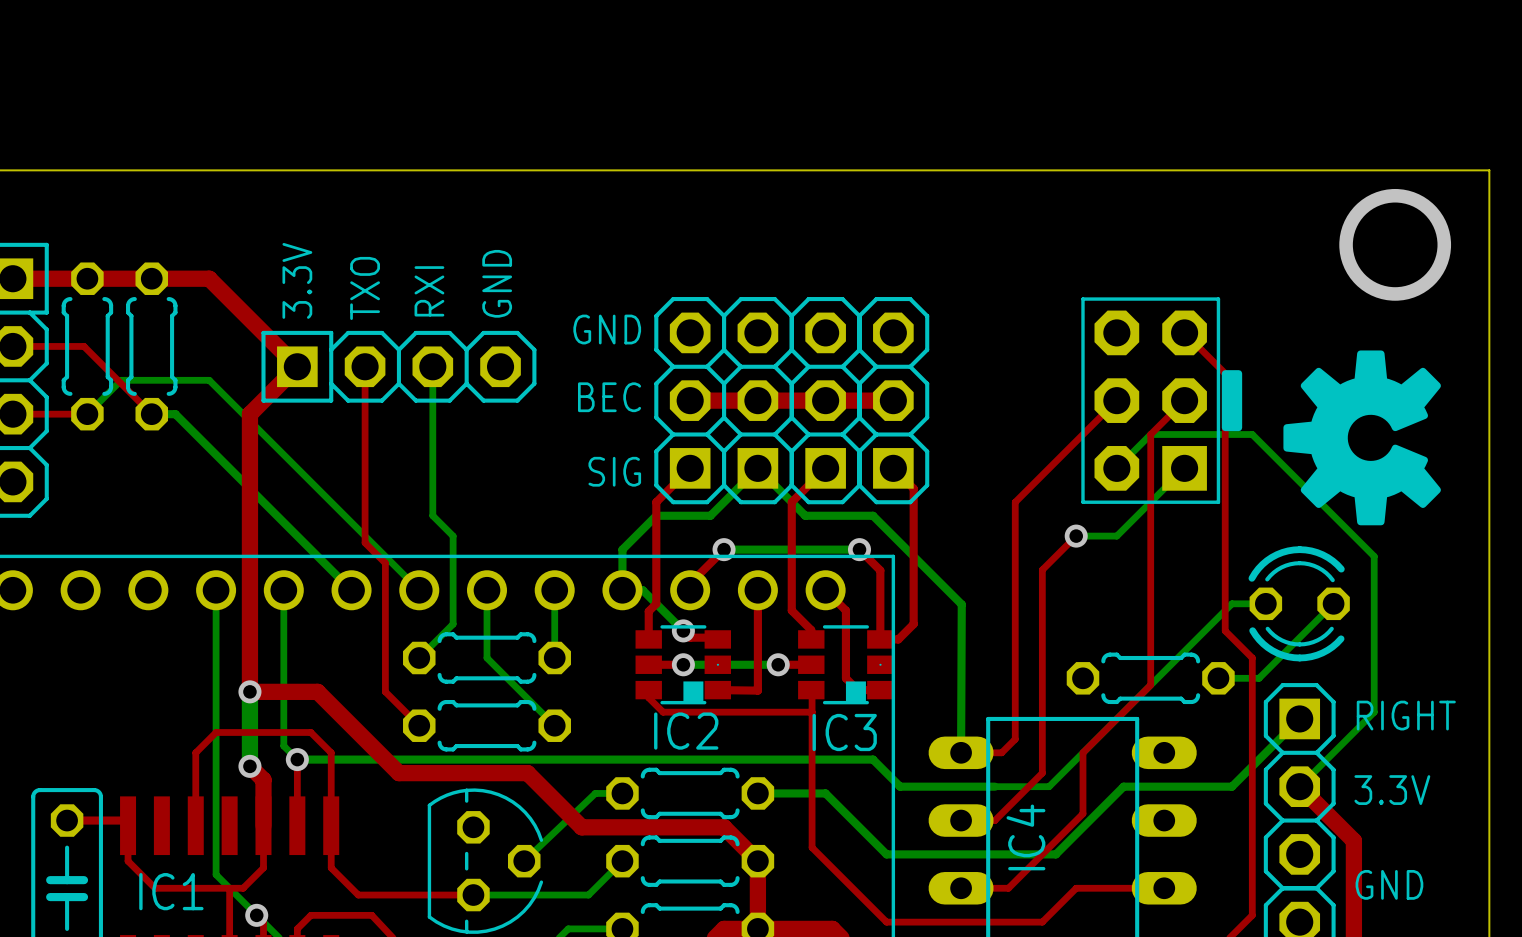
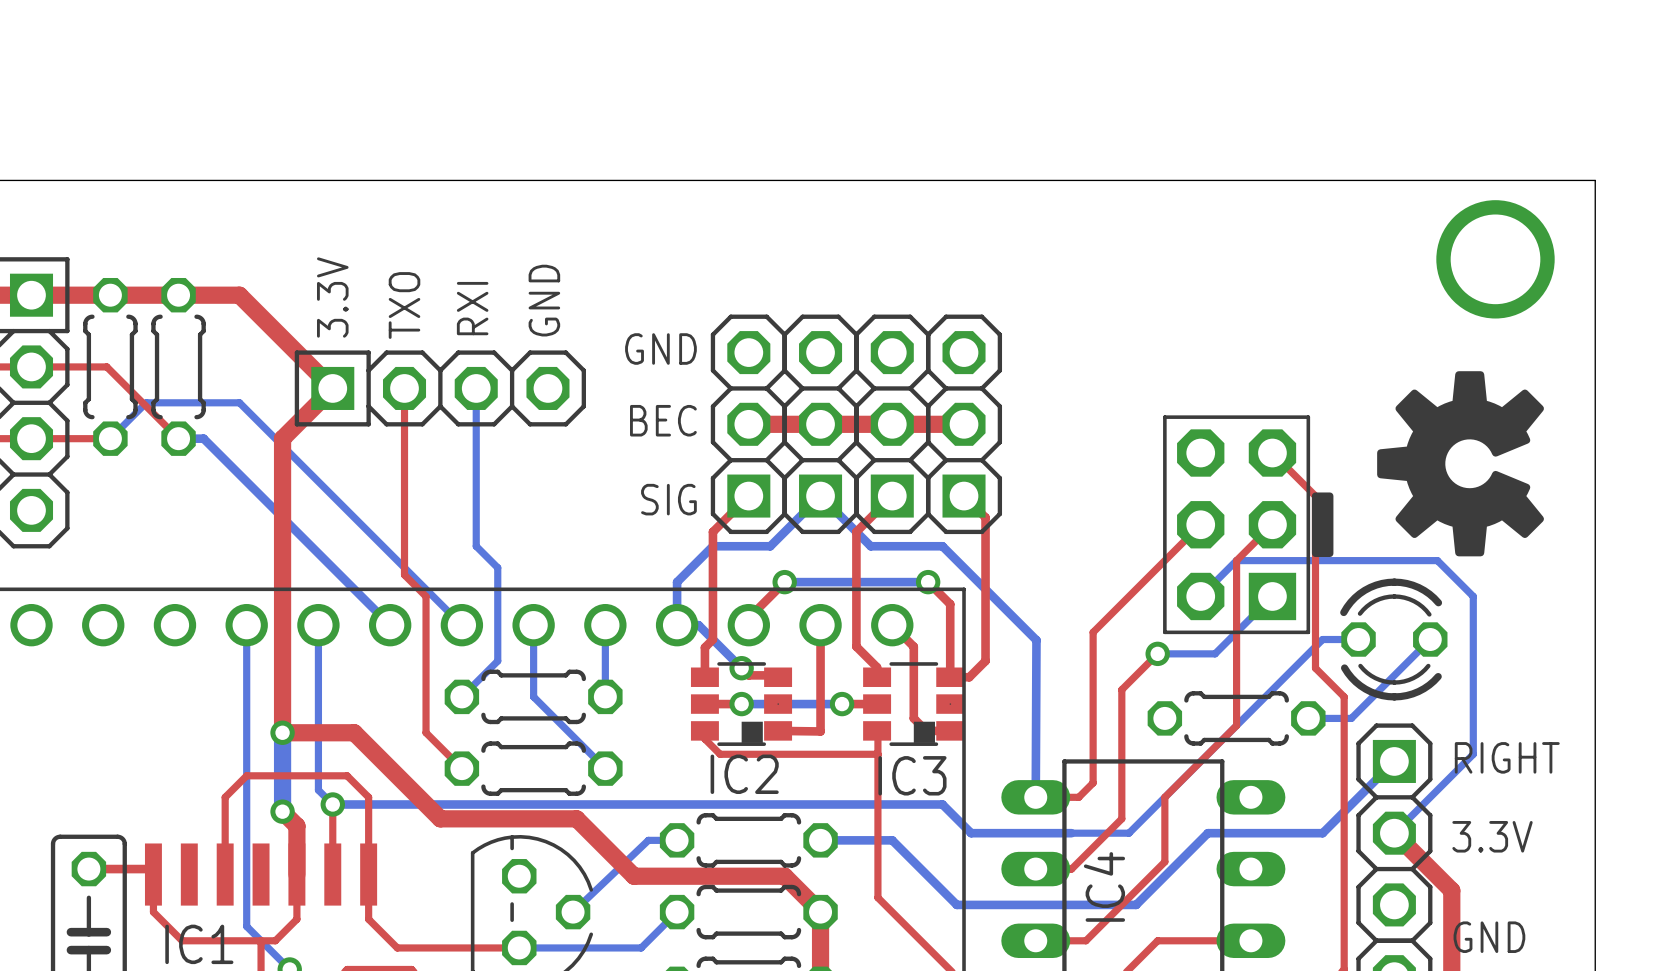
top track: (1184, 332) (1225, 373) (1225, 468) -> (1272, 453) (1315, 496)
top track: (1116, 400) (1015, 502) (1015, 597) -> (1121, 603) (1093, 632)
part position: (1150, 400) -> (1236, 524)
top track: (1184, 400) (1150, 434) (1150, 529) -> (1272, 524) (1236, 560)
drawing position: (1231, 400) -> (1322, 524)
bottom track: (1116, 468) (1150, 434) (1252, 434) (1374, 556) (1374, 563) -> (1200, 596) (1236, 560) (1437, 560) (1473, 596)
bottom track: (1184, 468) (1116, 536) (1076, 536) -> none
top track: none -> (1200, 524) (1157, 567)
via position: (1076, 536) -> (1157, 653)
bottom track: none -> (1272, 596) (1215, 653) (1157, 653)
top track: (1042, 569) (1042, 651) -> (1157, 653) (1121, 689)

